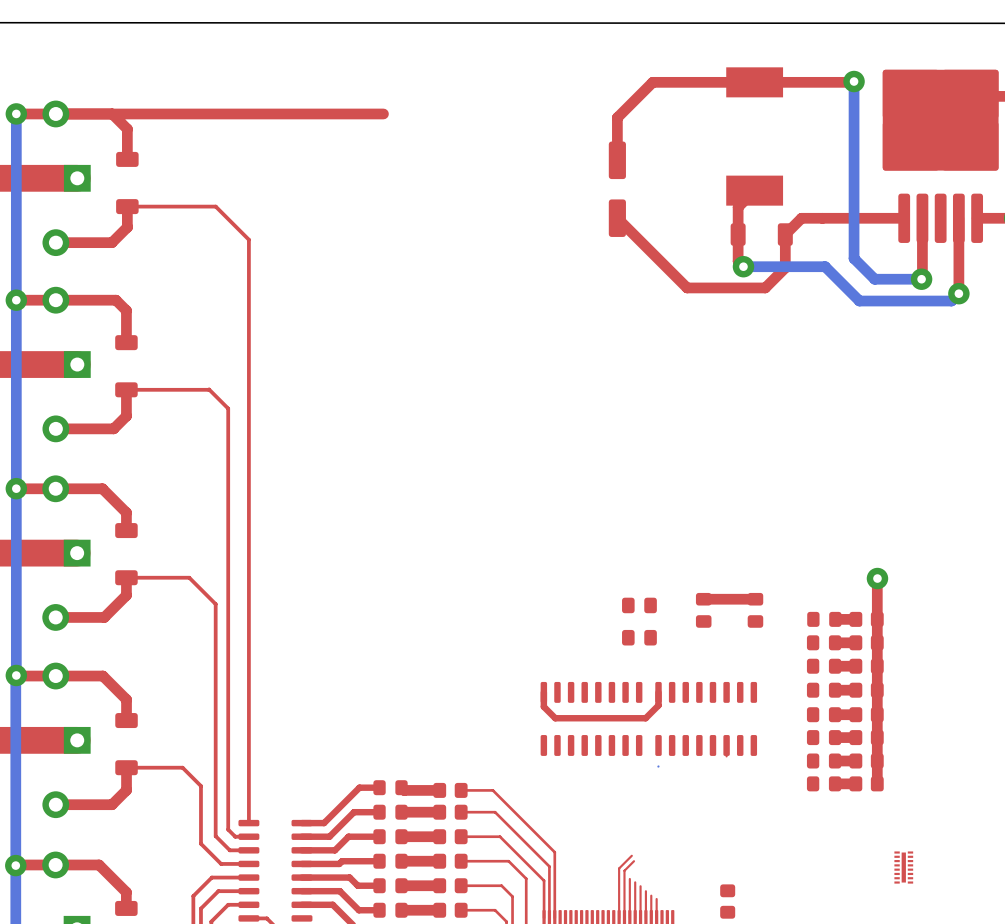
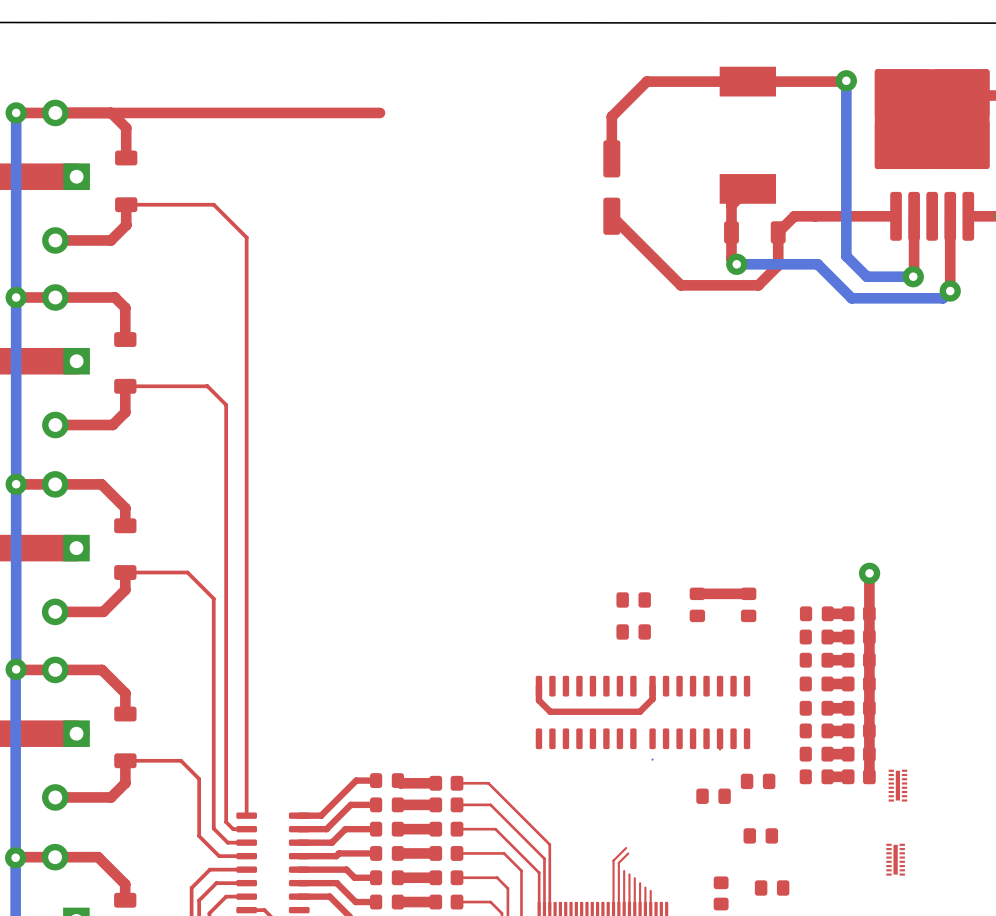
part: none -> (758, 781)
part: none -> (897, 785)
part: none -> (713, 796)
part: none -> (760, 835)
part: none -> (772, 888)

